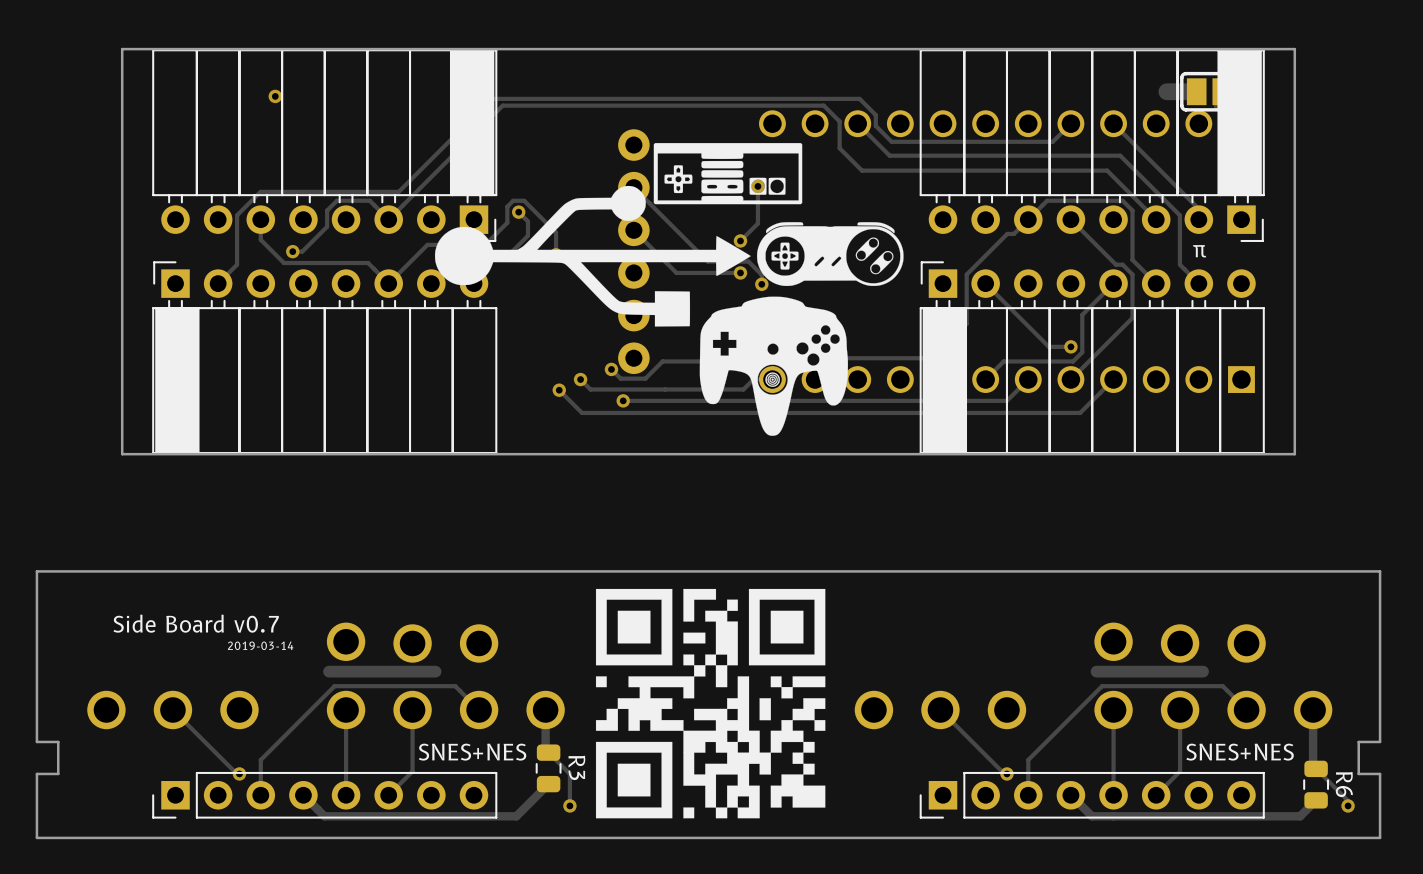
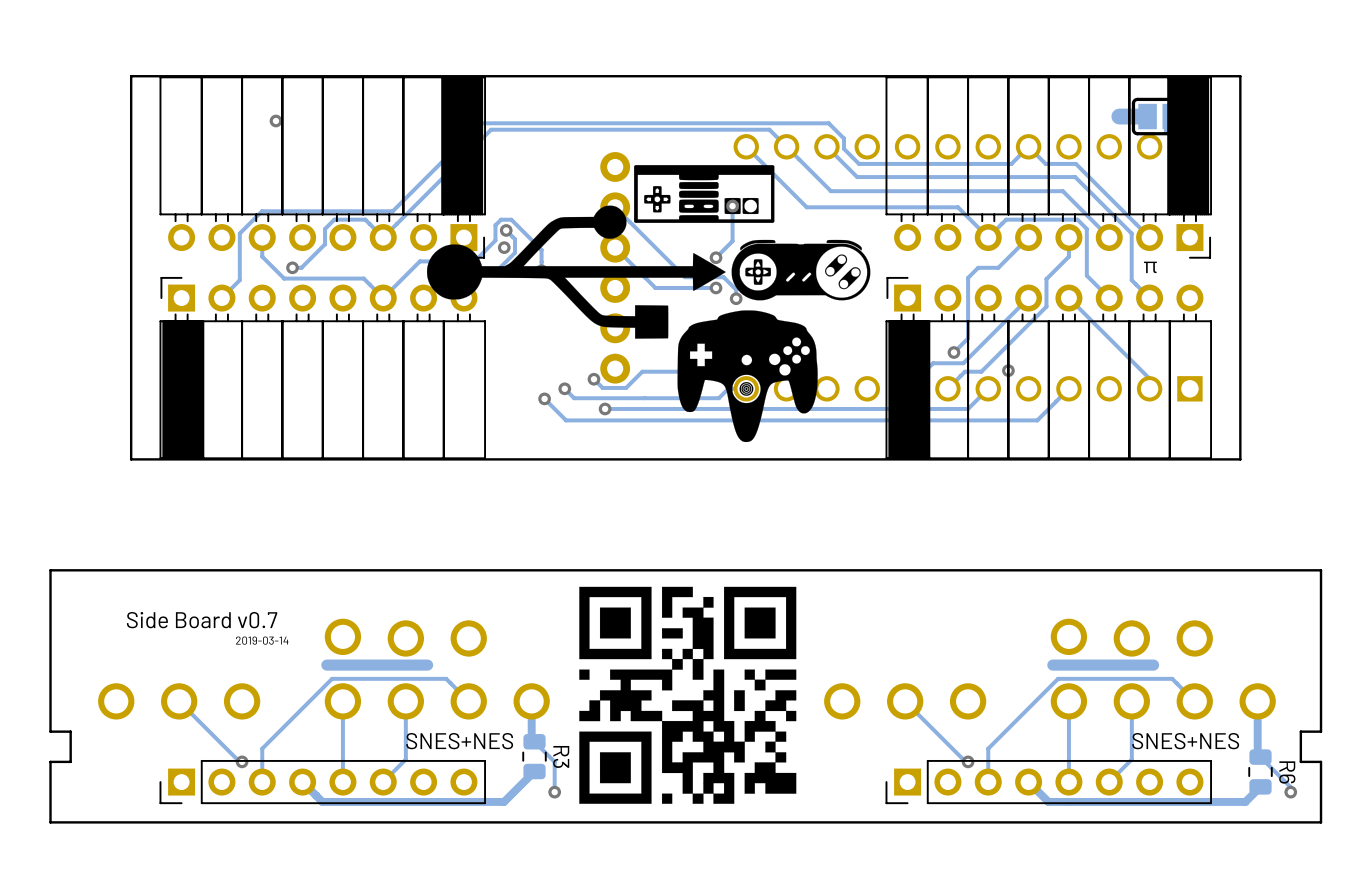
track: (797, 105) (823, 105) (839, 121) (839, 148) -> (769, 129) (809, 170)
track: (1113, 123) (1198, 208) (1198, 219) -> (1028, 146) (1045, 163) (1075, 163) (1149, 237)
track: (1028, 219) (1014, 233) (1007, 233) (966, 274) (966, 323) (932, 358) (836, 358) (815, 379) -> (988, 237) (958, 207) (806, 207) (746, 146)
track: (1070, 219) (1115, 264) (1122, 264) (1132, 274) (1132, 317) (1070, 379) -> (1028, 237) (998, 267) (978, 267) (968, 277) (968, 338) (953, 352)
via: none -> (504, 247)
track: (985, 283) (1048, 346) (1070, 346) -> none
track: none -> (1028, 298) (963, 363) (933, 363) (907, 388)
track: (1113, 283) (1082, 314) (1082, 352) (1073, 361) (1021, 361) -> (1068, 237) (1068, 256) (1046, 279) (1046, 306) (981, 371)
track: none -> (1068, 298) (1149, 378) (1149, 388)
via: none -> (953, 352)
via position: (1070, 346) -> (1008, 370)

